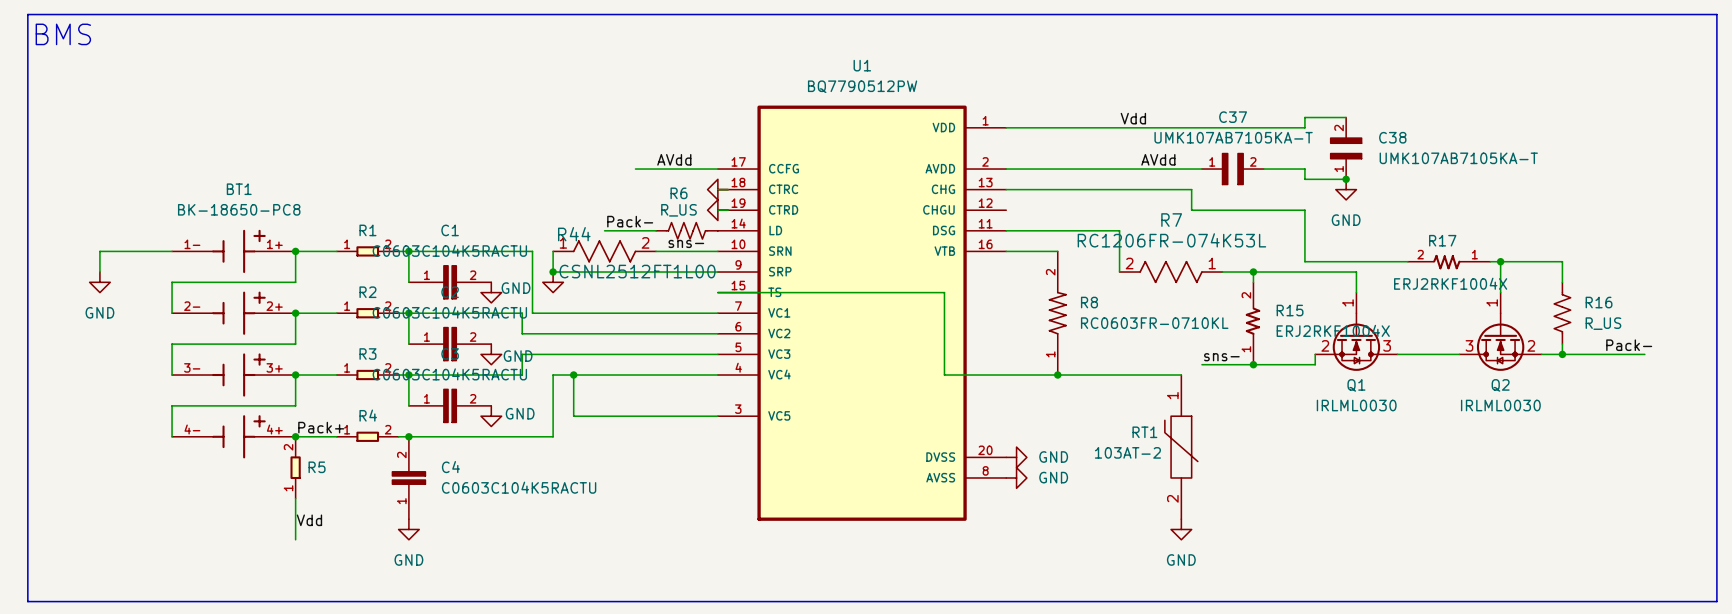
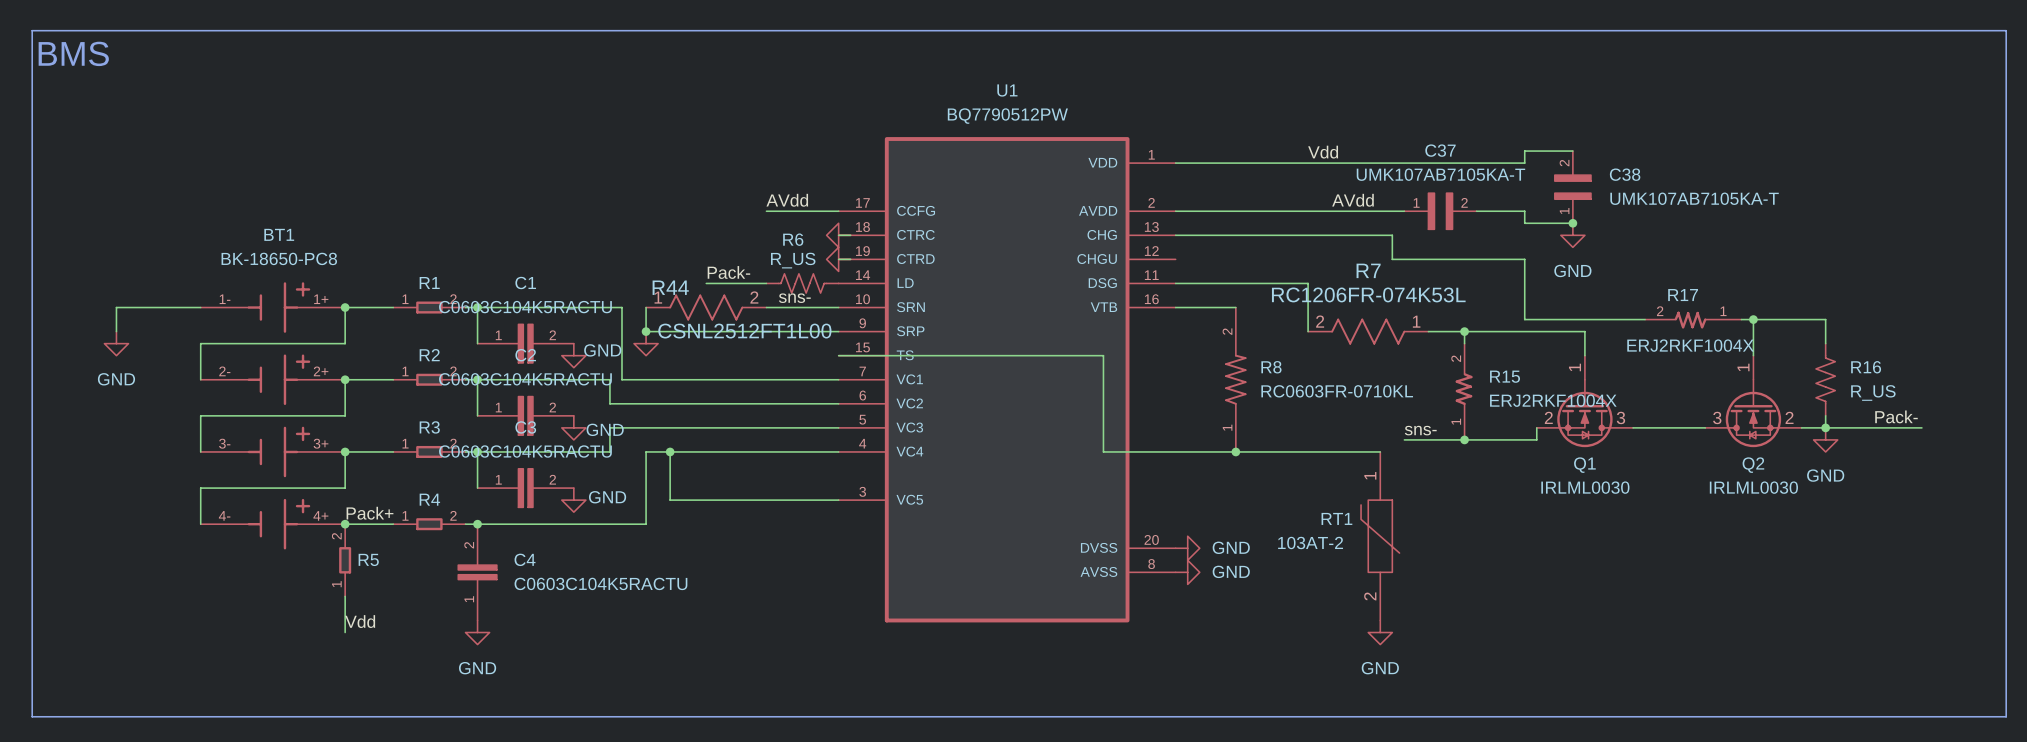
wire: (635, 169) (656, 169) -> none
power symbol: none -> GND (1825, 439)
wire: (295, 529) (295, 539) -> none

